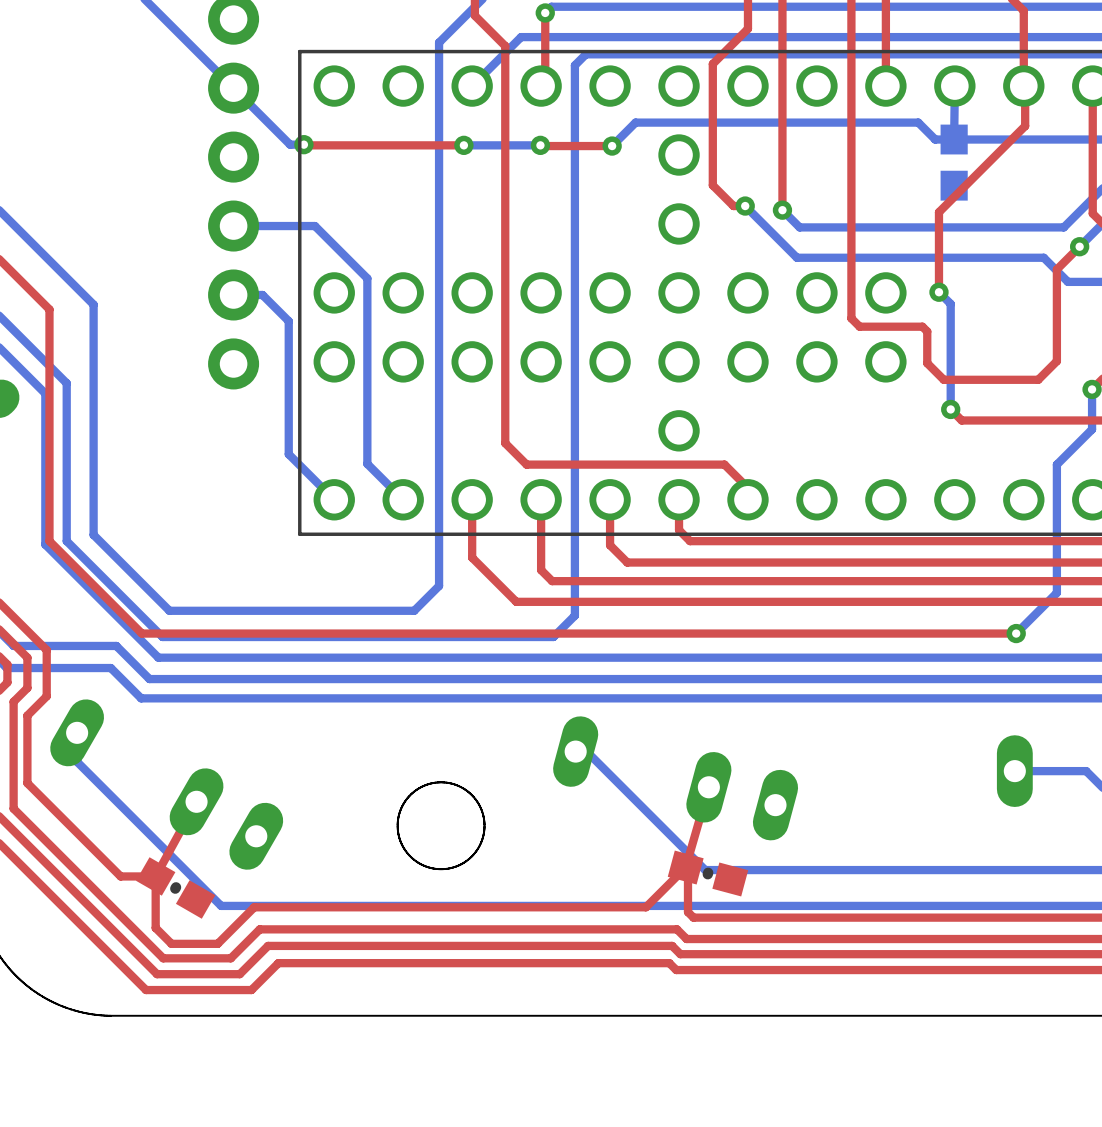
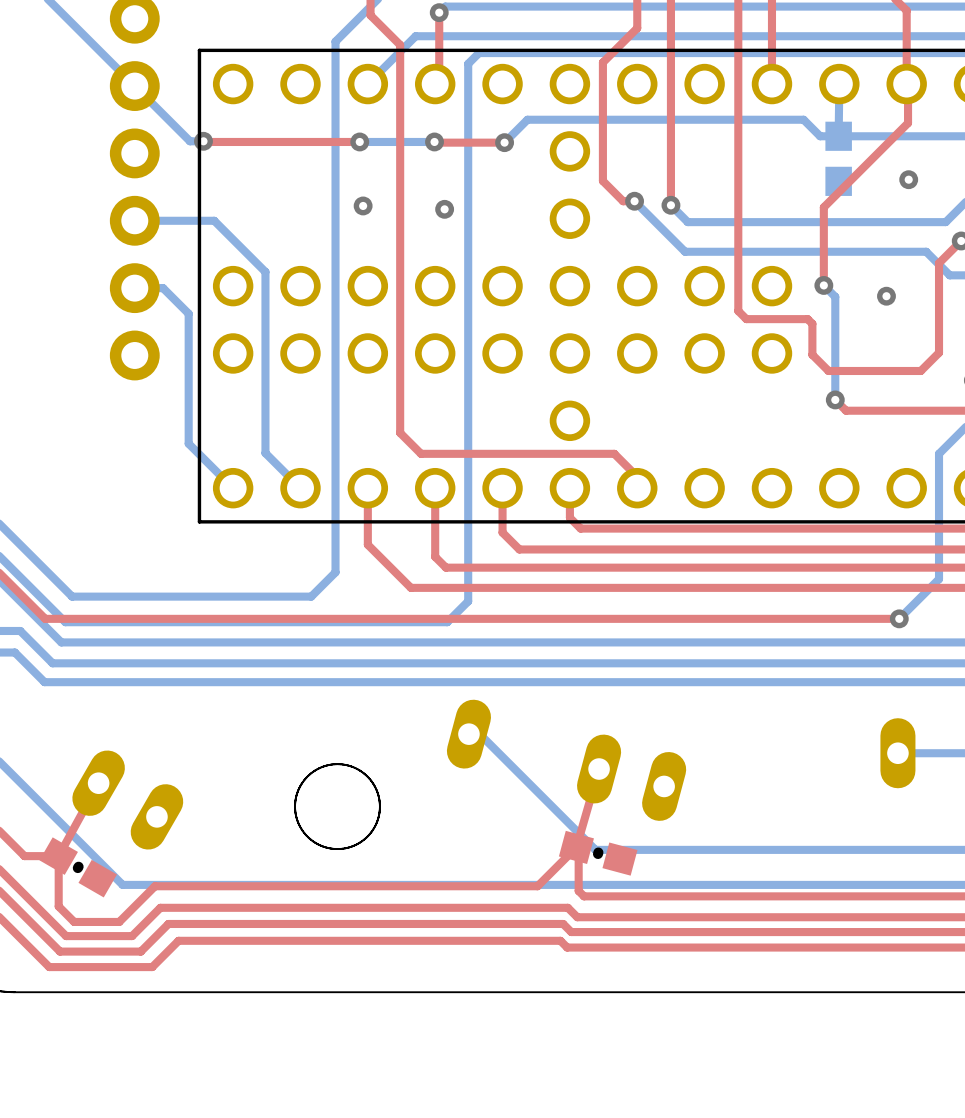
via: none -> (908, 179)
via: none -> (363, 205)
via: none -> (444, 209)
via: none -> (886, 296)

